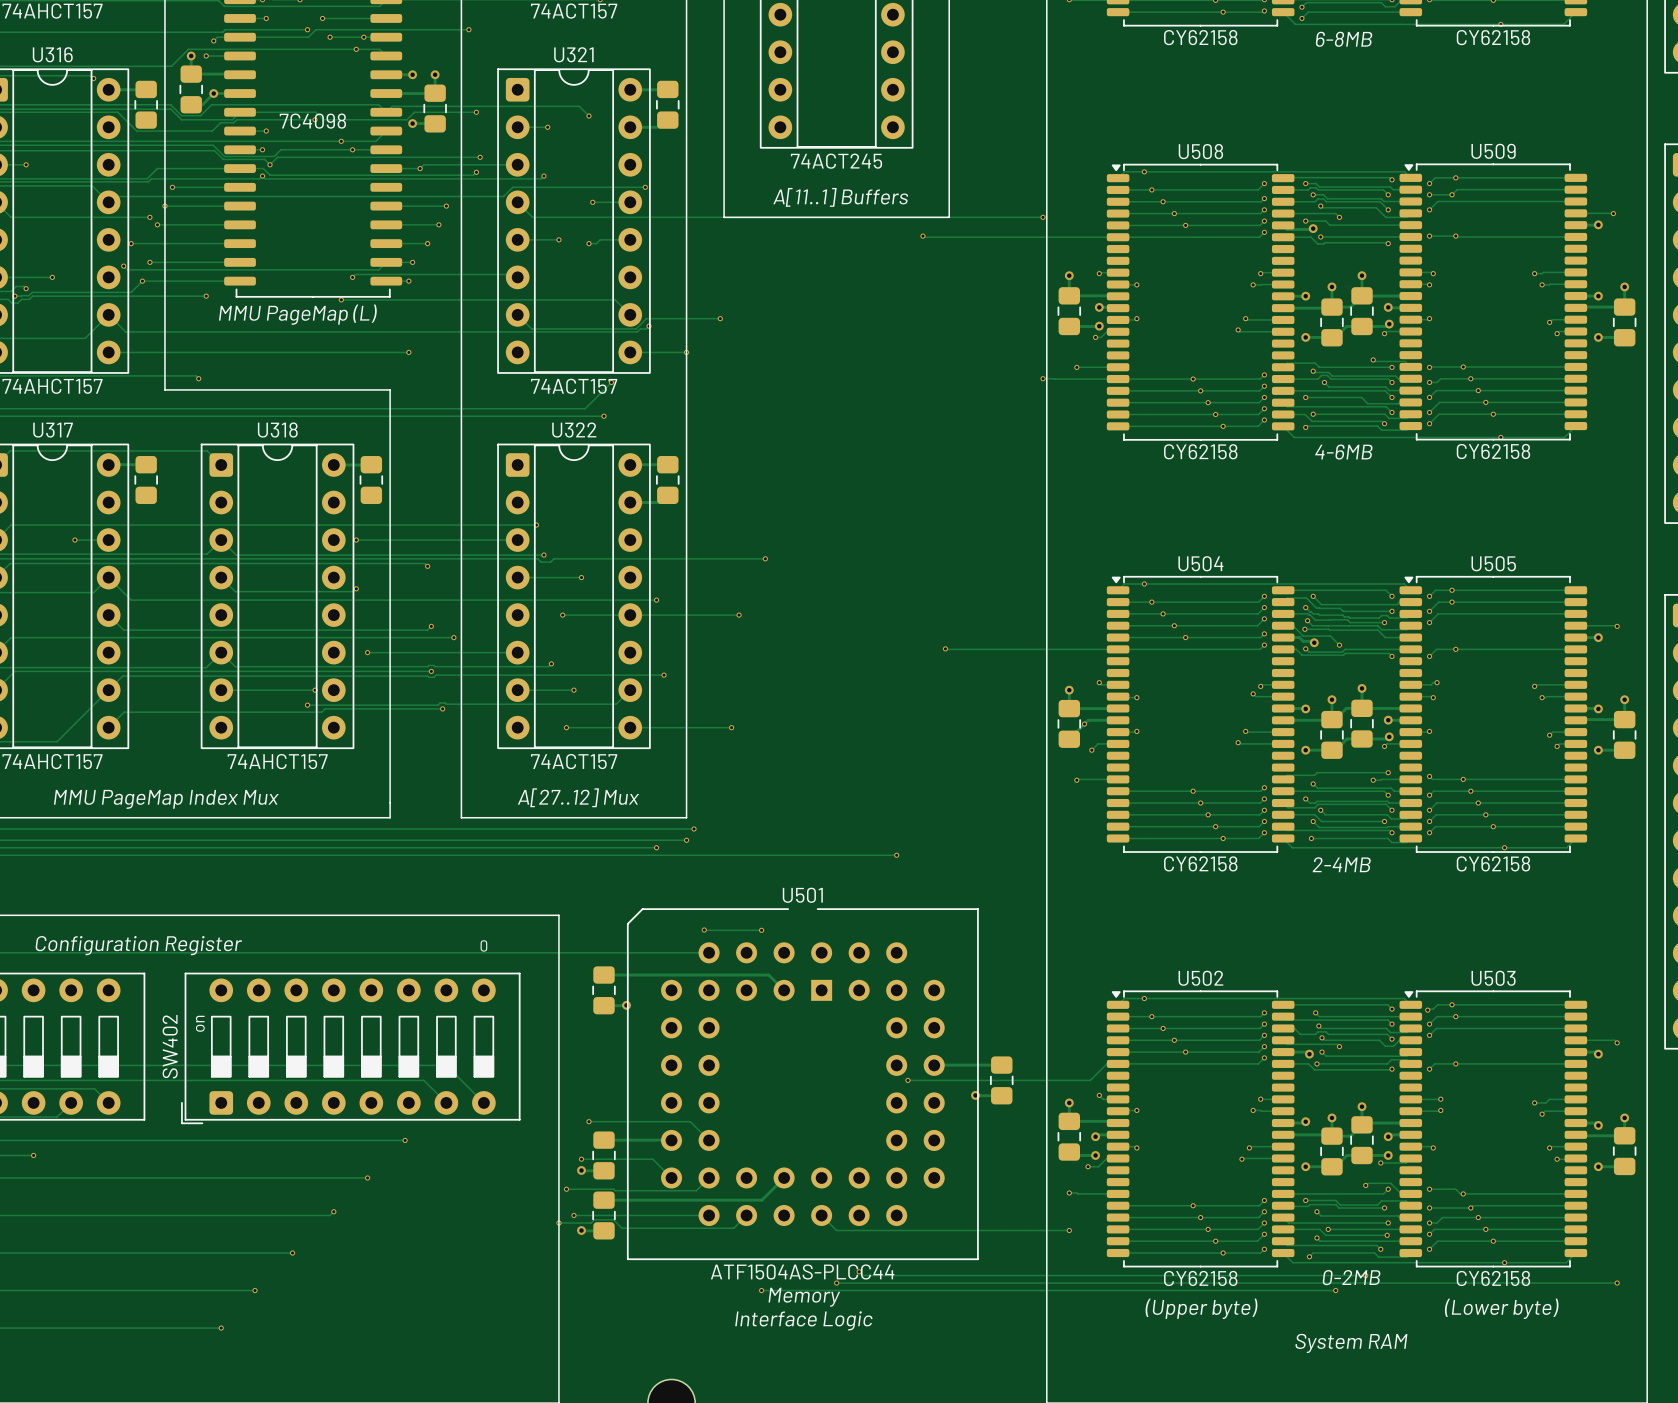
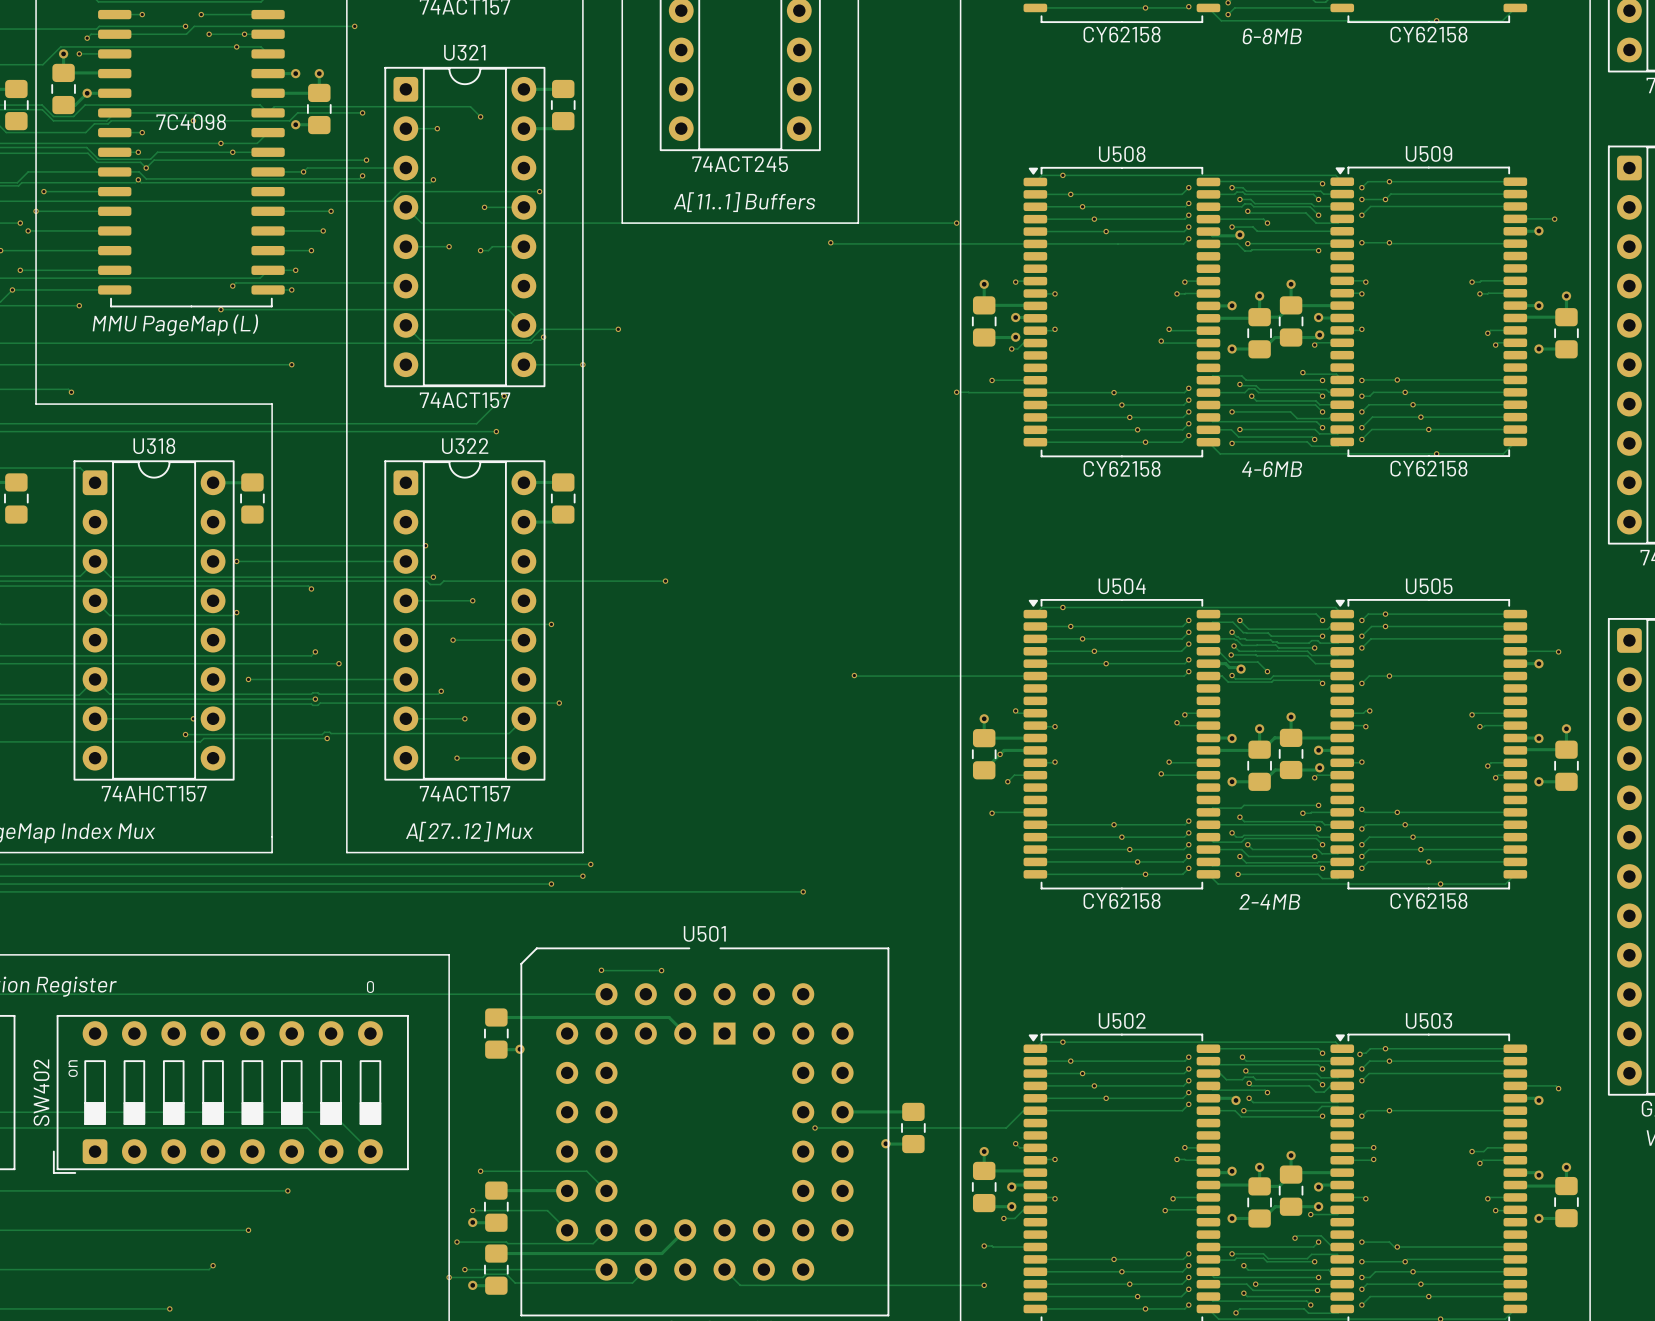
track: (630, 615) (739, 615) -> none
via: (739, 615) -> none
track: (630, 727) (731, 727) -> none
via: (731, 727) -> none

